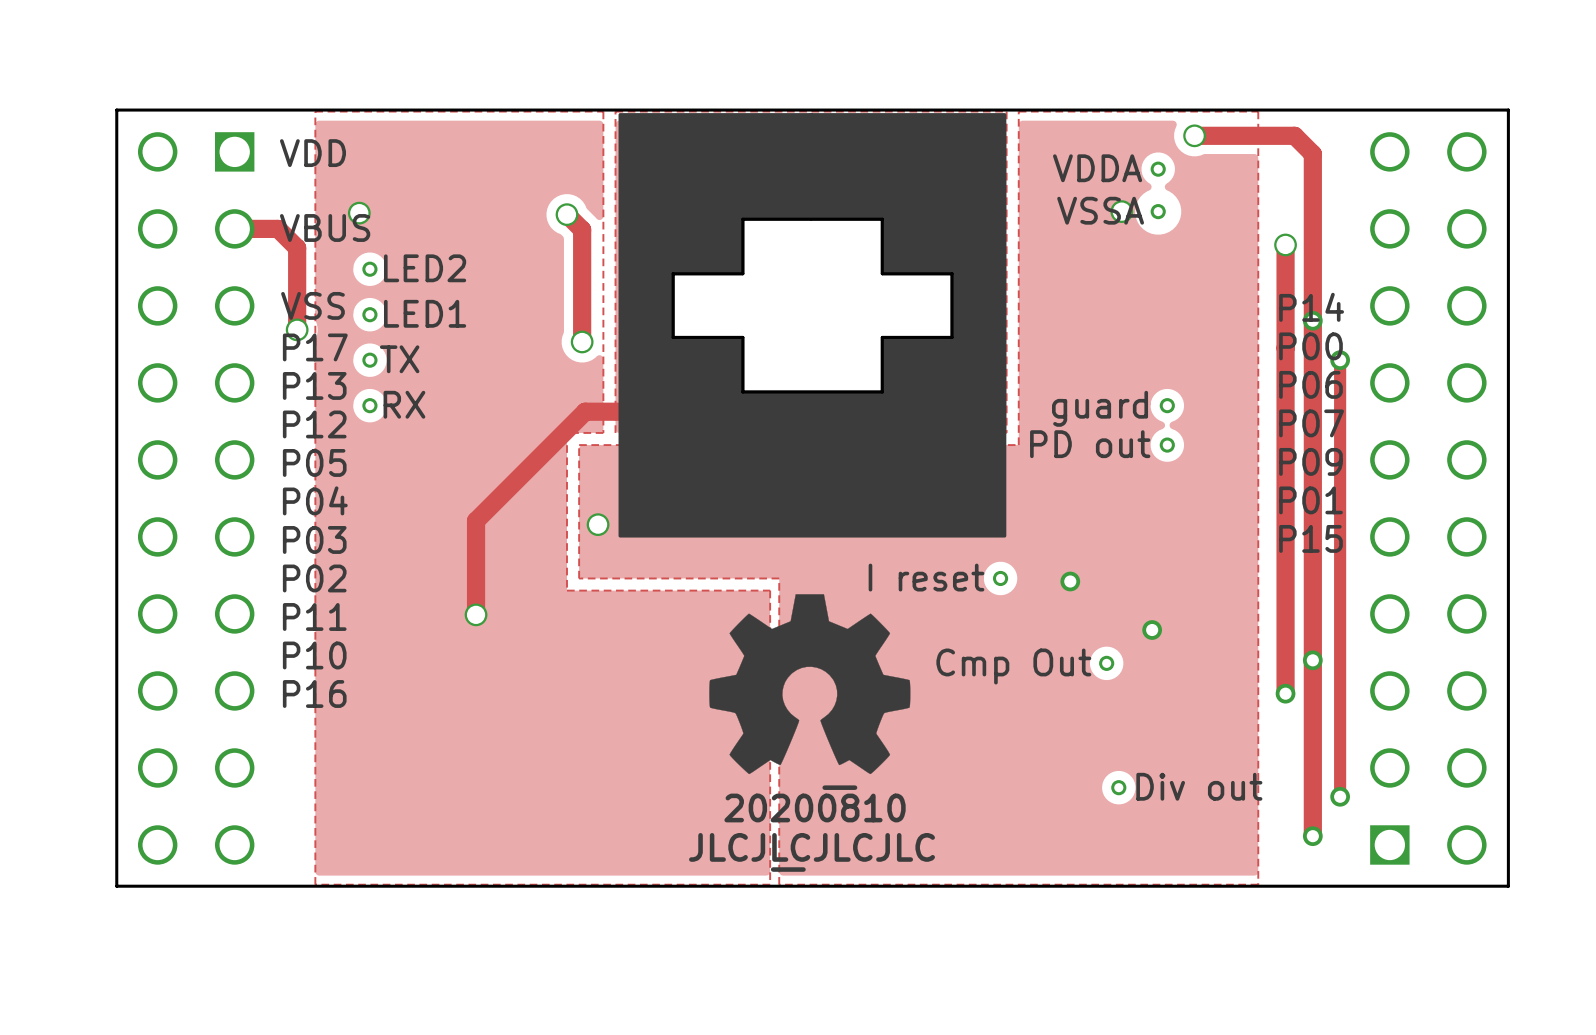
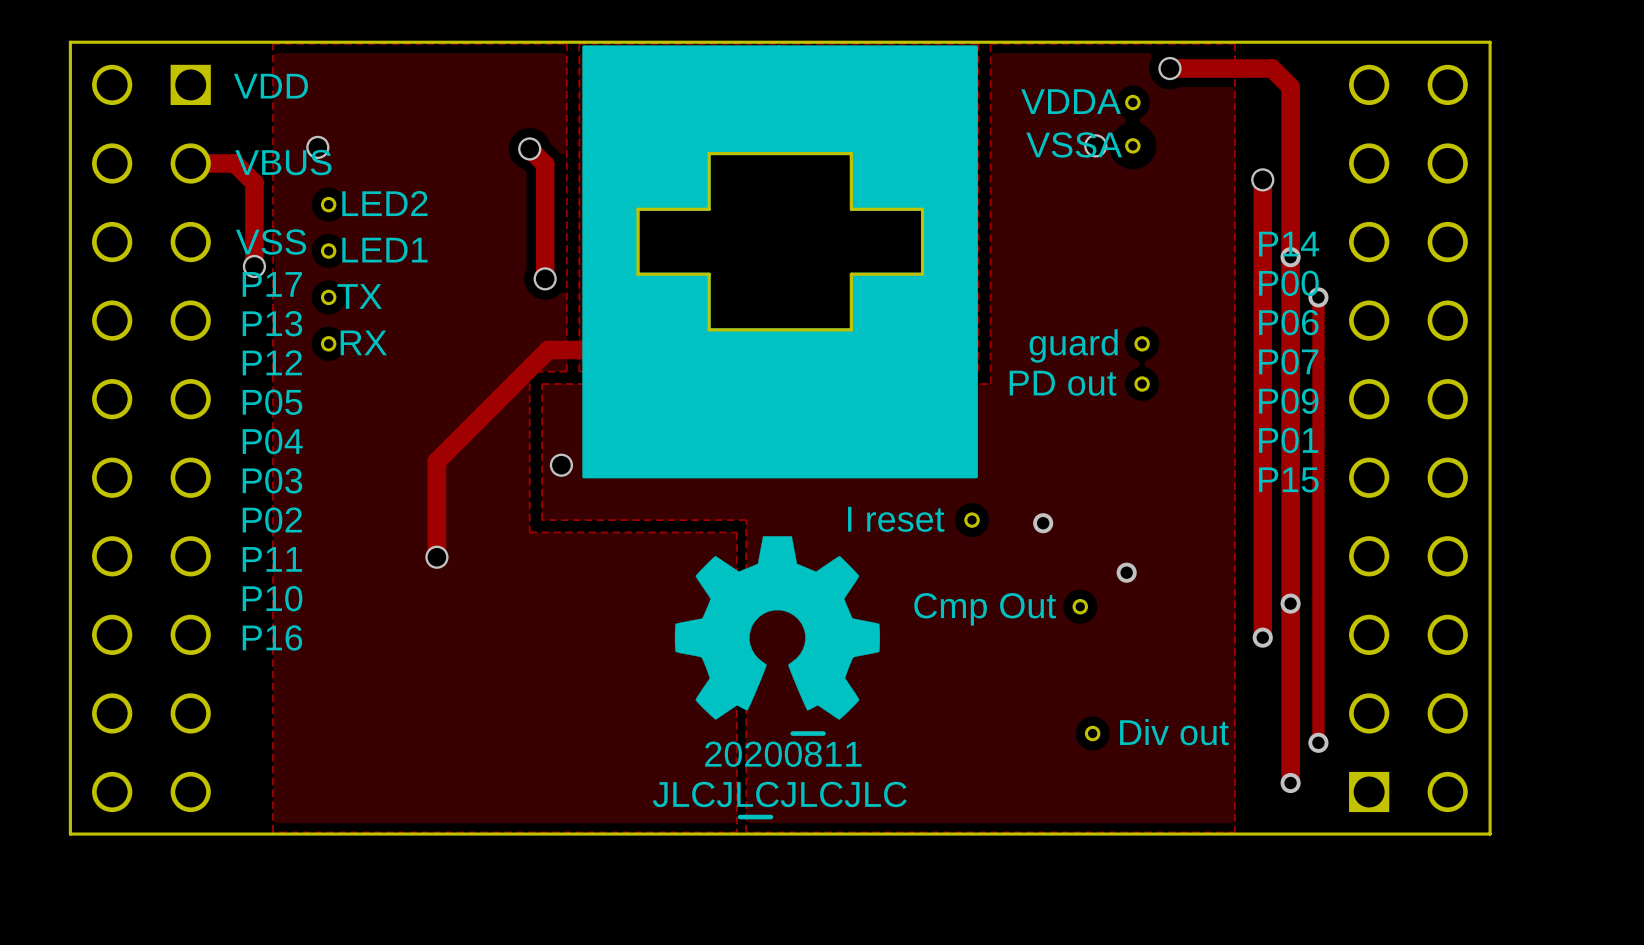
drawing shape: [724, 785, 906, 823] -> [705, 731, 862, 767]

